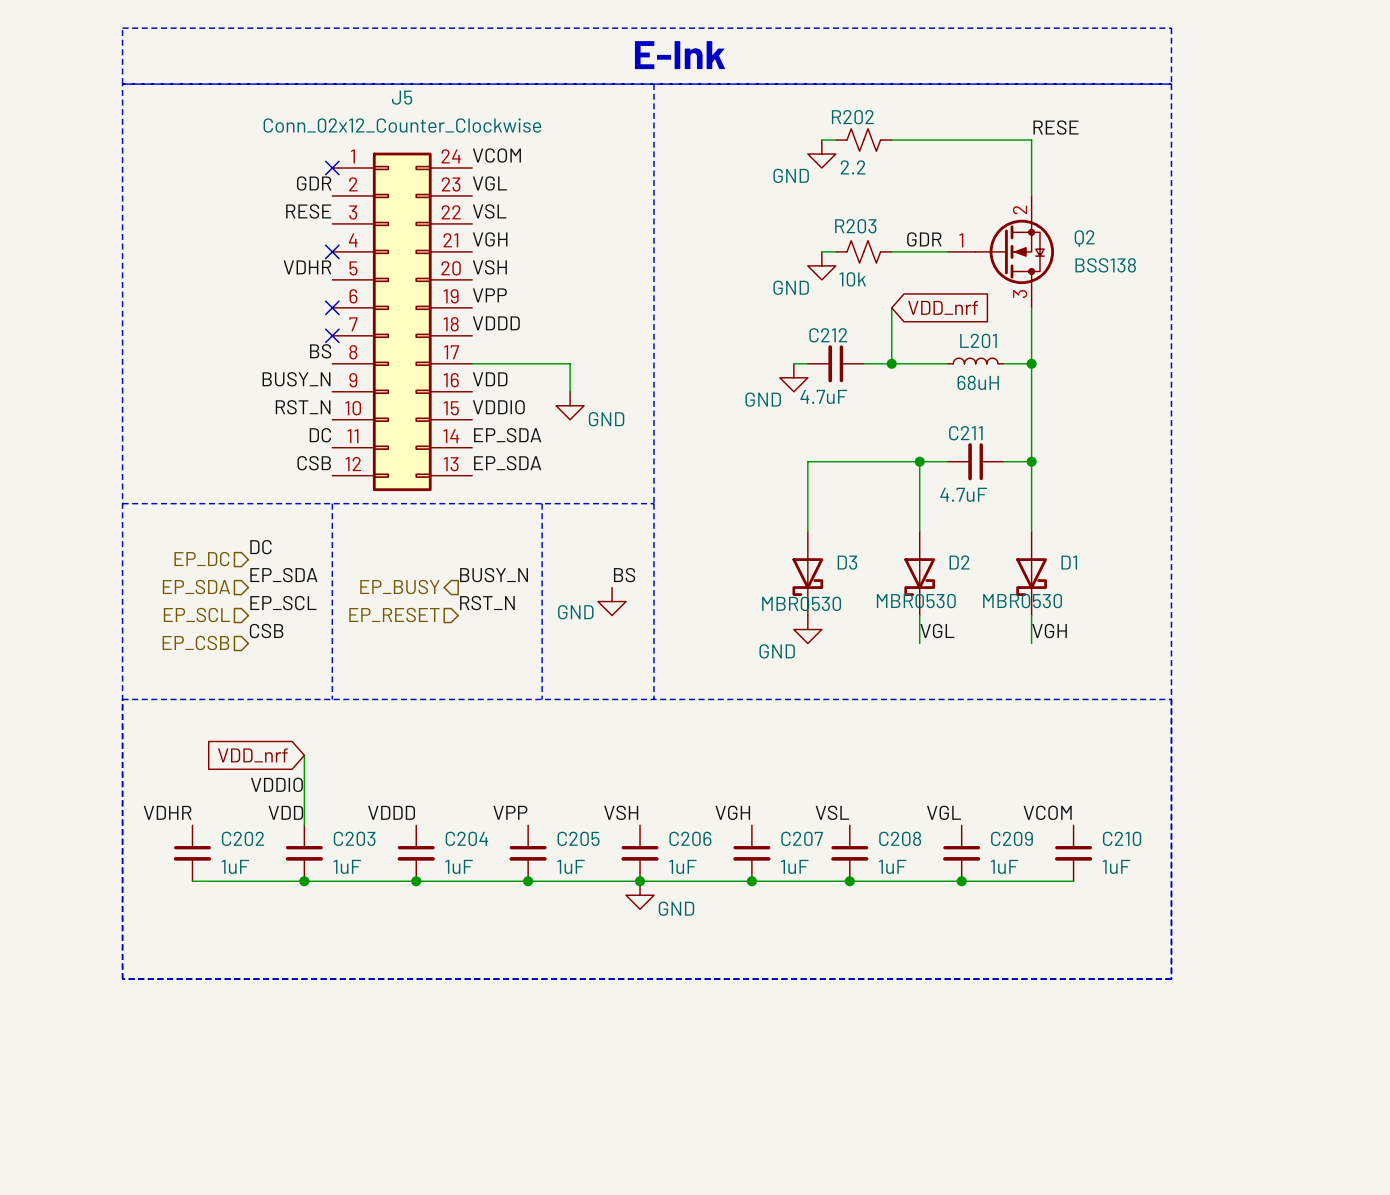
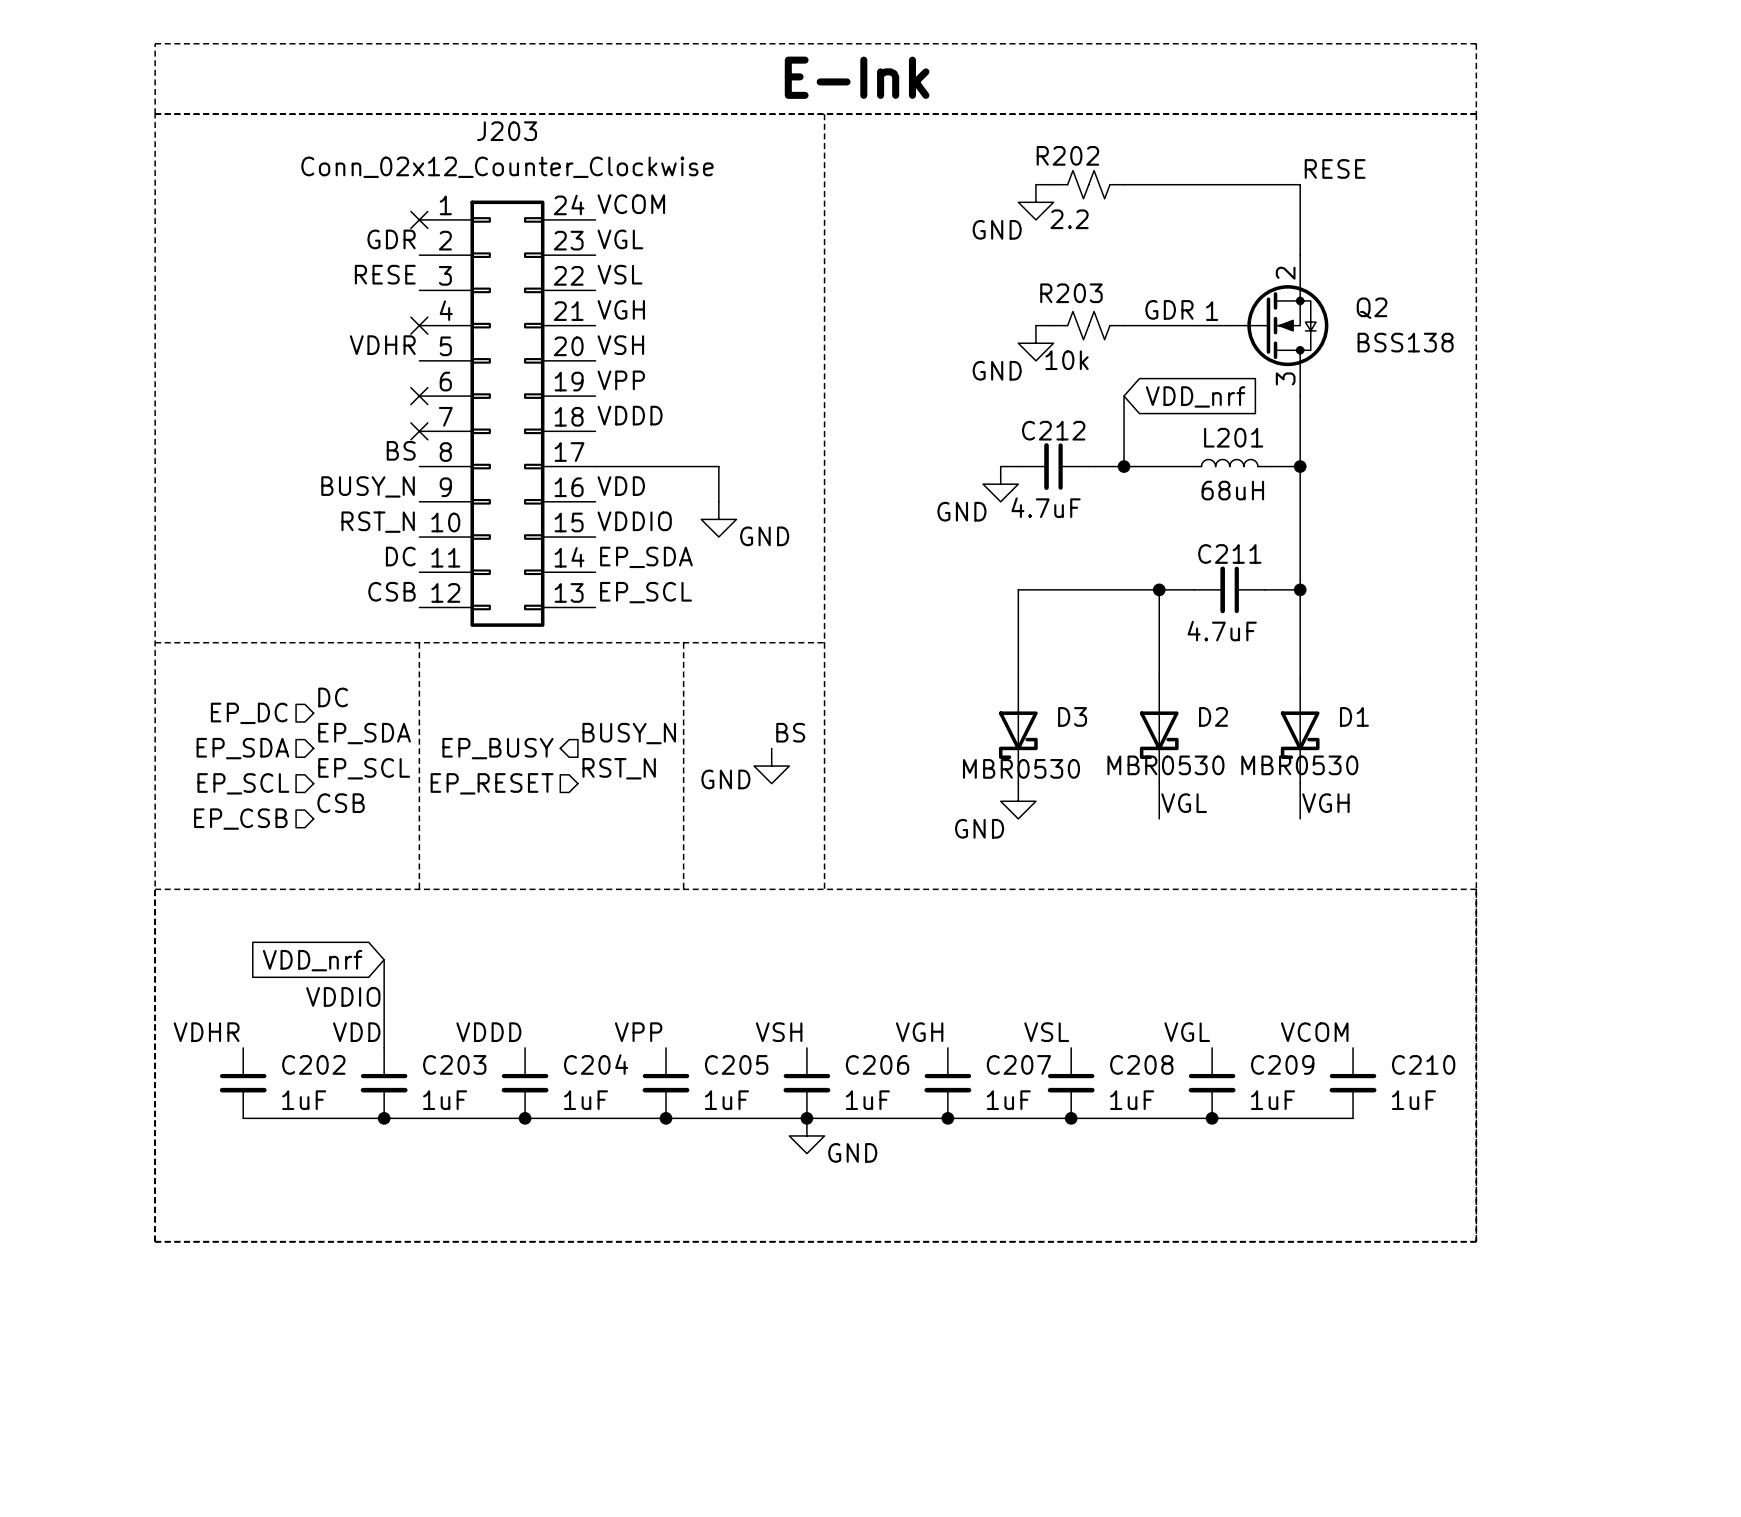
J5 name: J5 (402, 97) -> J203 (507, 131)
label: EP_SDA (507, 463) -> EP_SCL (646, 592)

